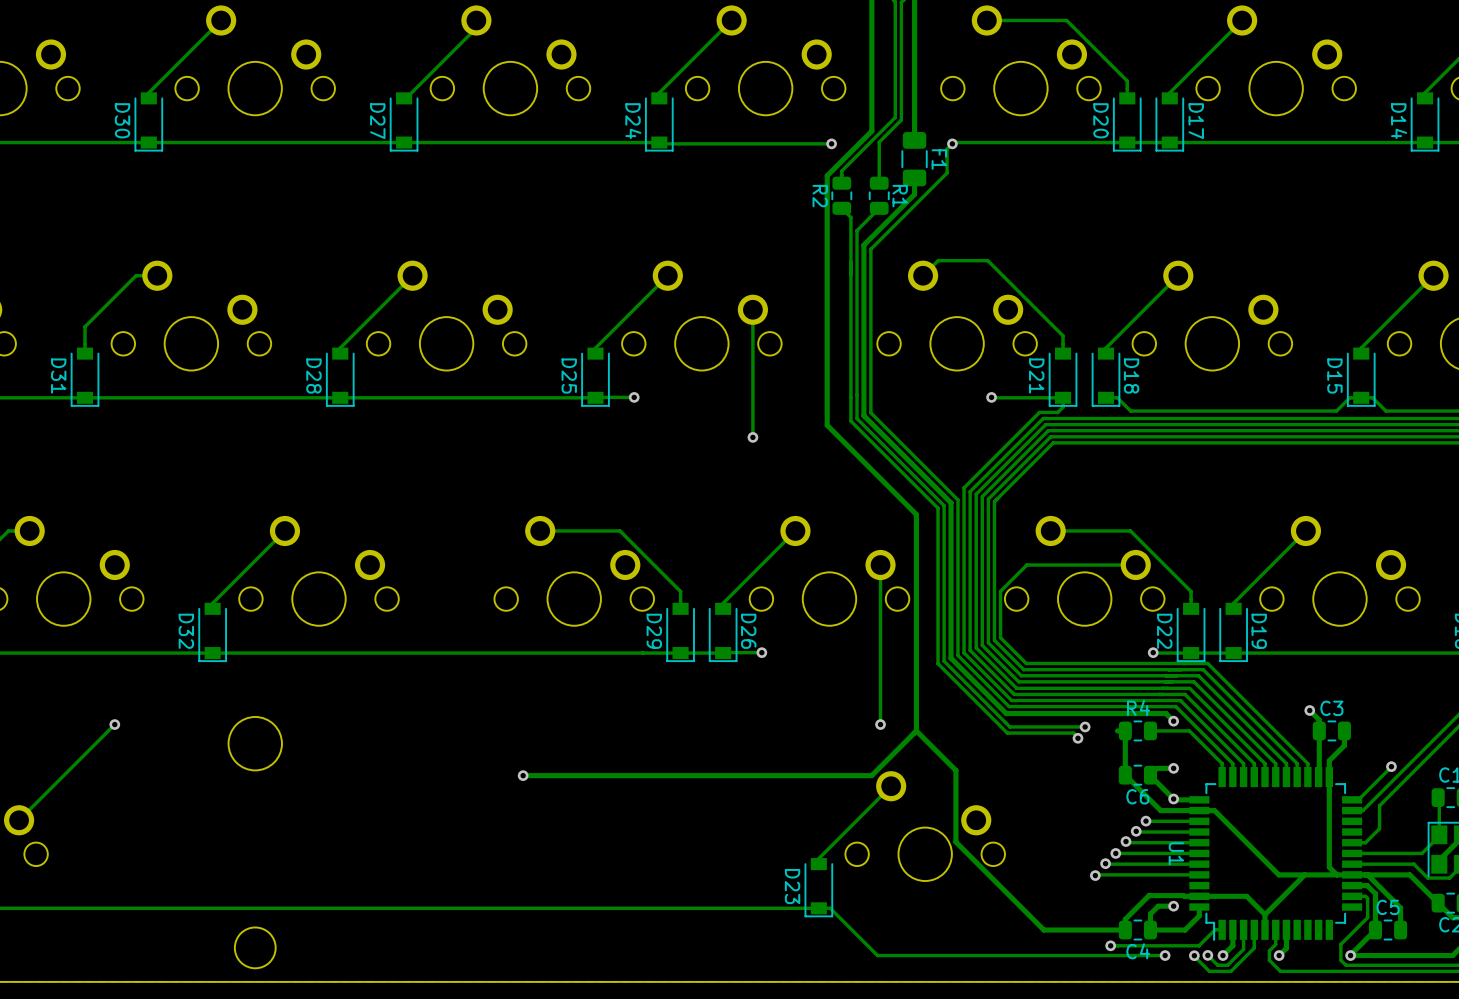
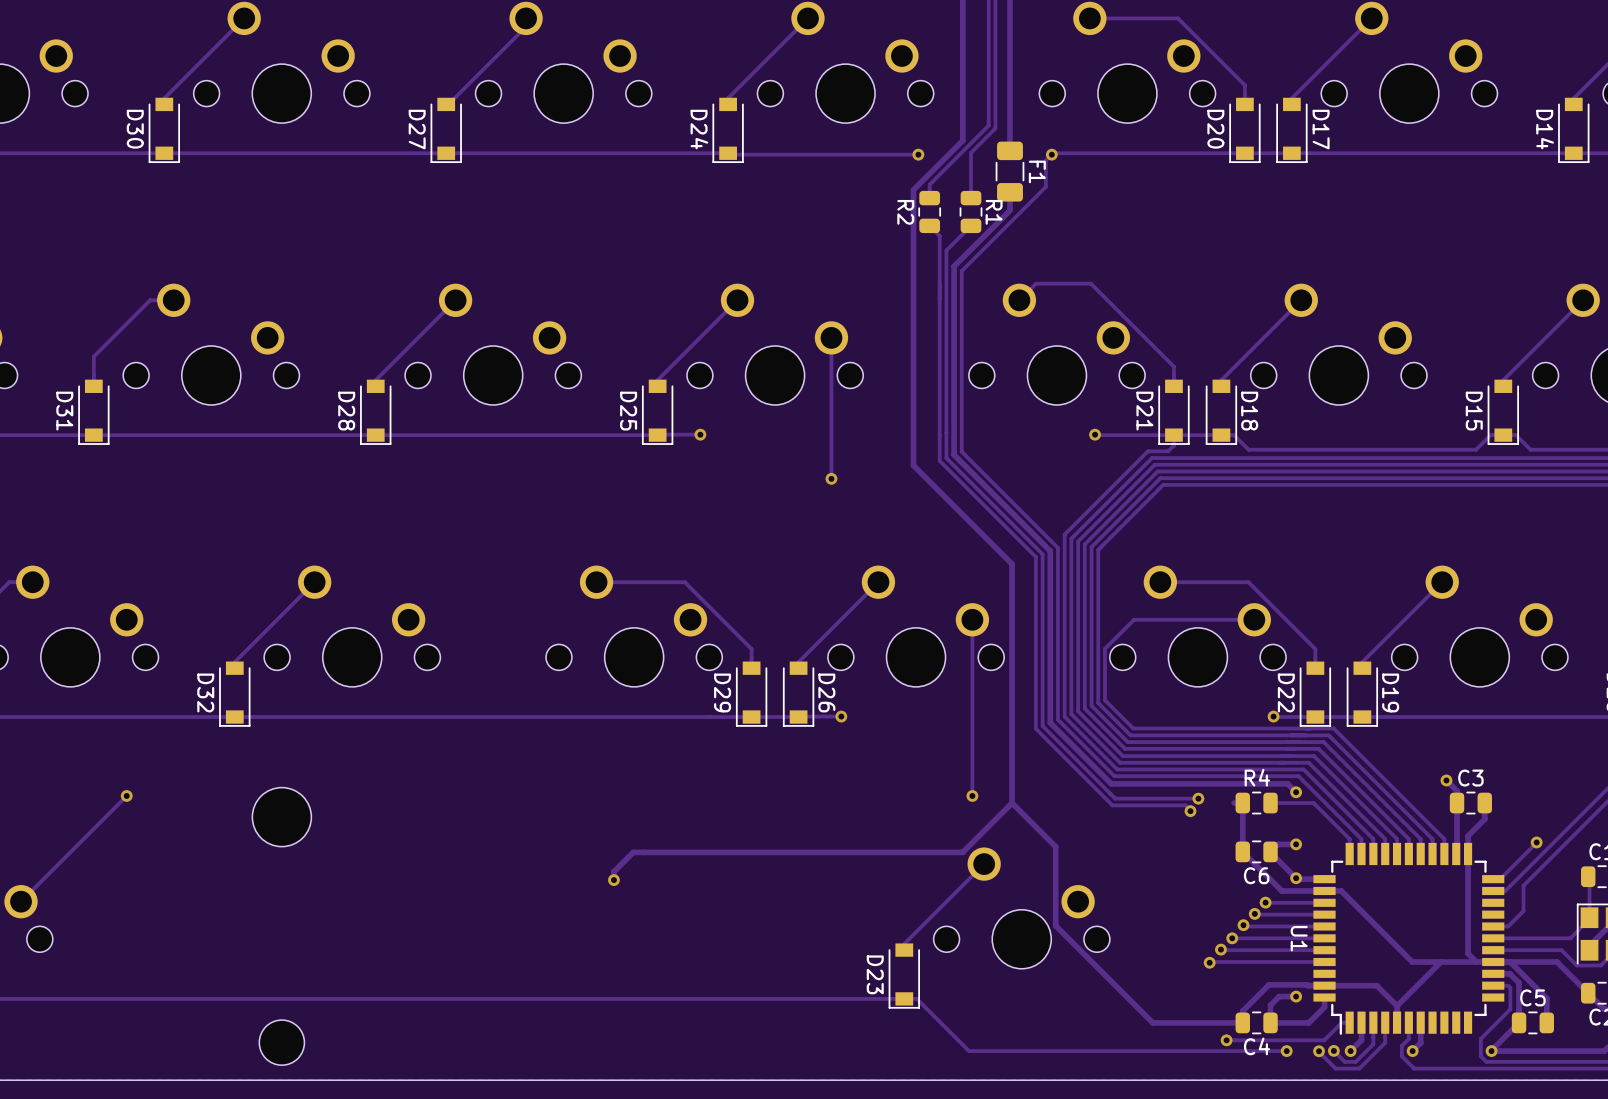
track: none -> (1221, 435) (1173, 435)
via position: (523, 775) -> (613, 880)
track: (573, 775) (523, 775) -> (633, 852) (613, 871) (613, 880)

